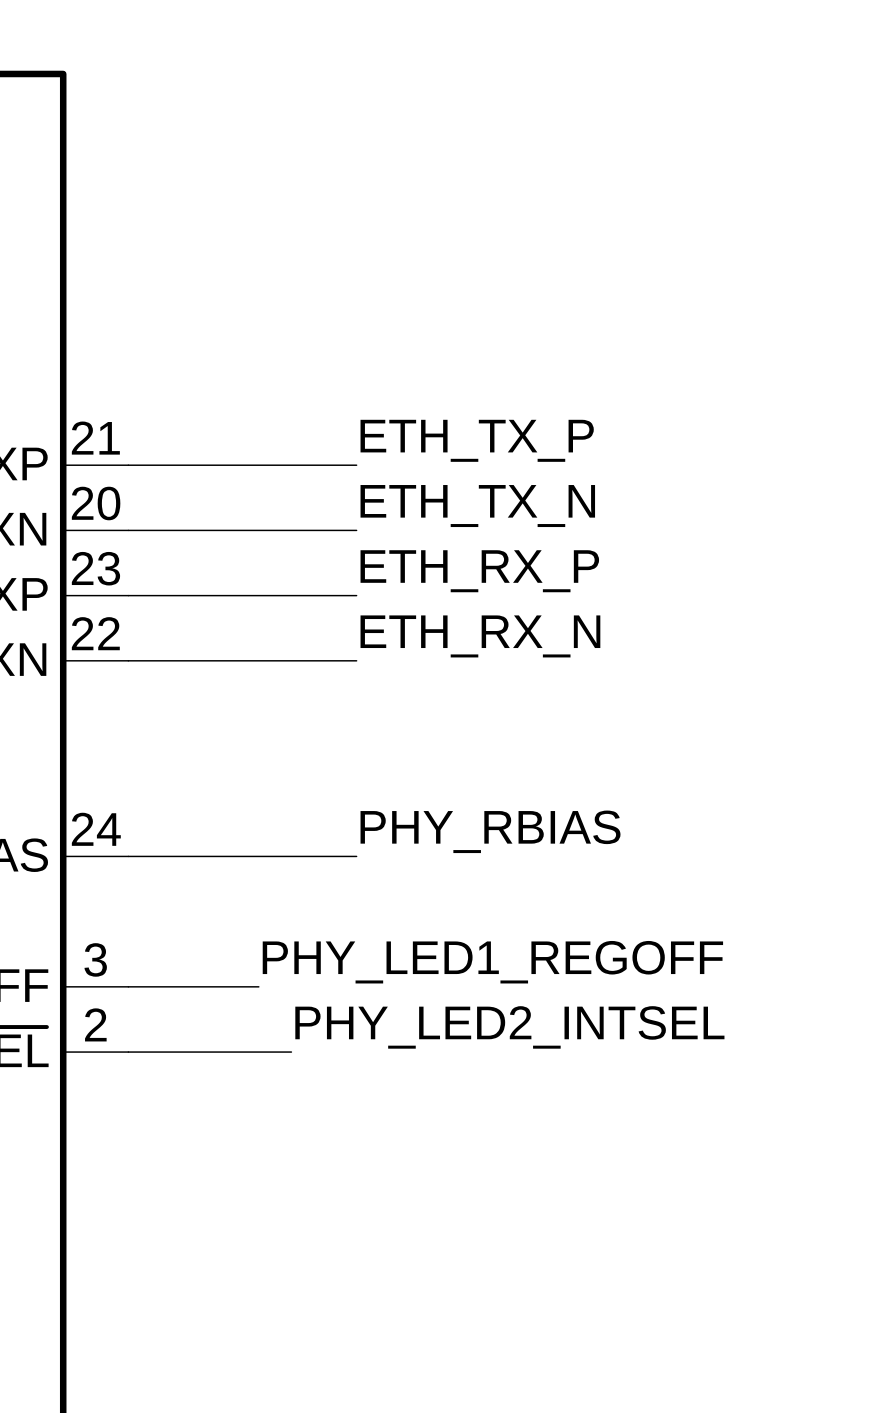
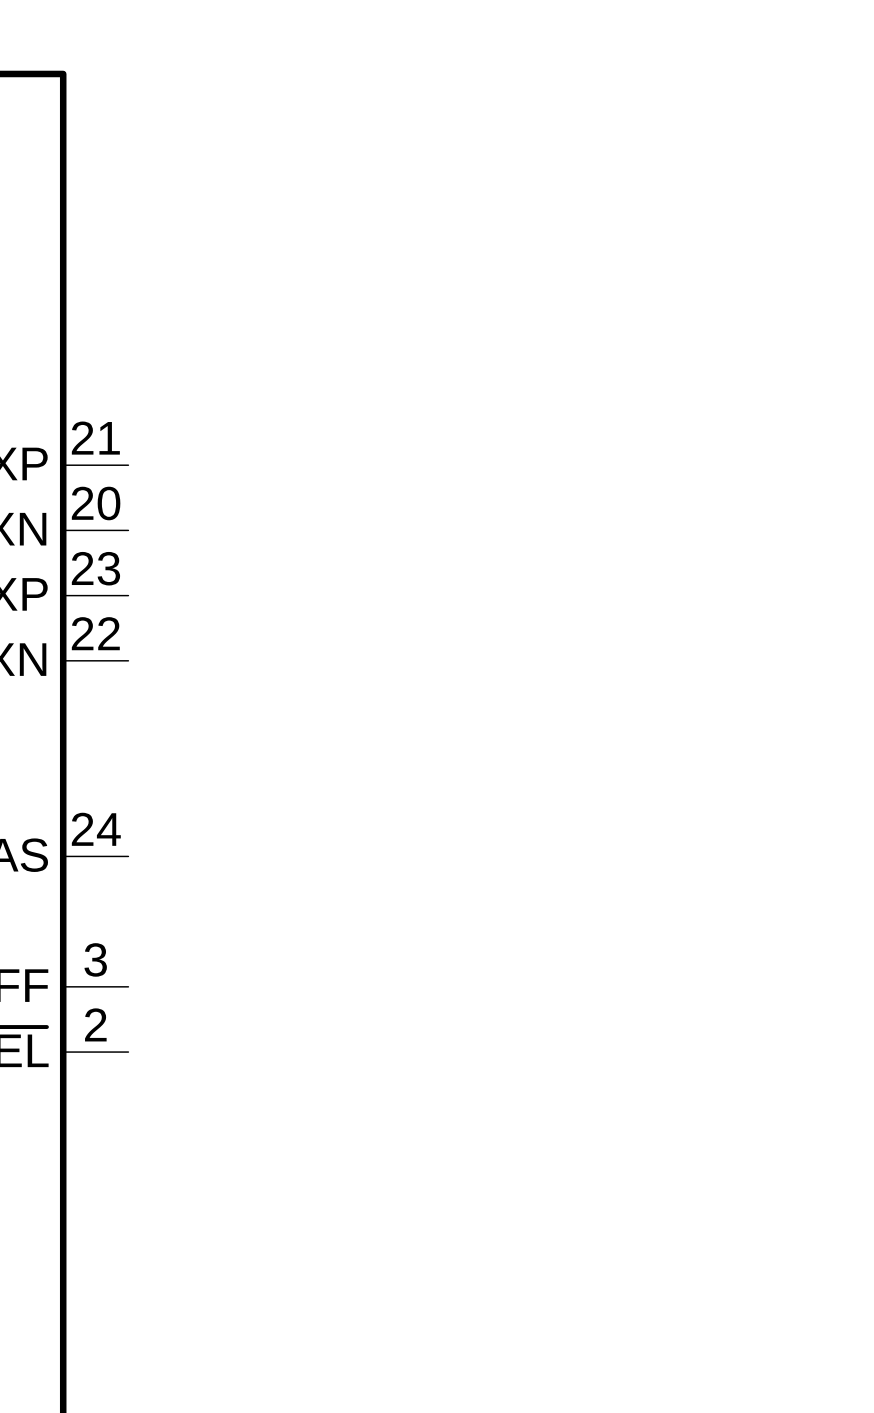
label: ETH_TX_P (477, 440) -> none
wire: (128, 465) (356, 465) -> none
label: ETH_TX_N (477, 506) -> none
wire: (128, 530) (356, 530) -> none
label: ETH_RX_P (479, 571) -> none
wire: (128, 595) (356, 595) -> none
label: ETH_RX_N (480, 636) -> none
wire: (128, 660) (356, 660) -> none
label: PHY_RBIAS (490, 831) -> none
wire: (128, 856) (356, 856) -> none
label: PHY_LED1_REGOFF (492, 962) -> none
wire: (128, 986) (258, 986) -> none
label: PHY_LED2_INTSEL (509, 1027) -> none
wire: (128, 1052) (291, 1052) -> none

